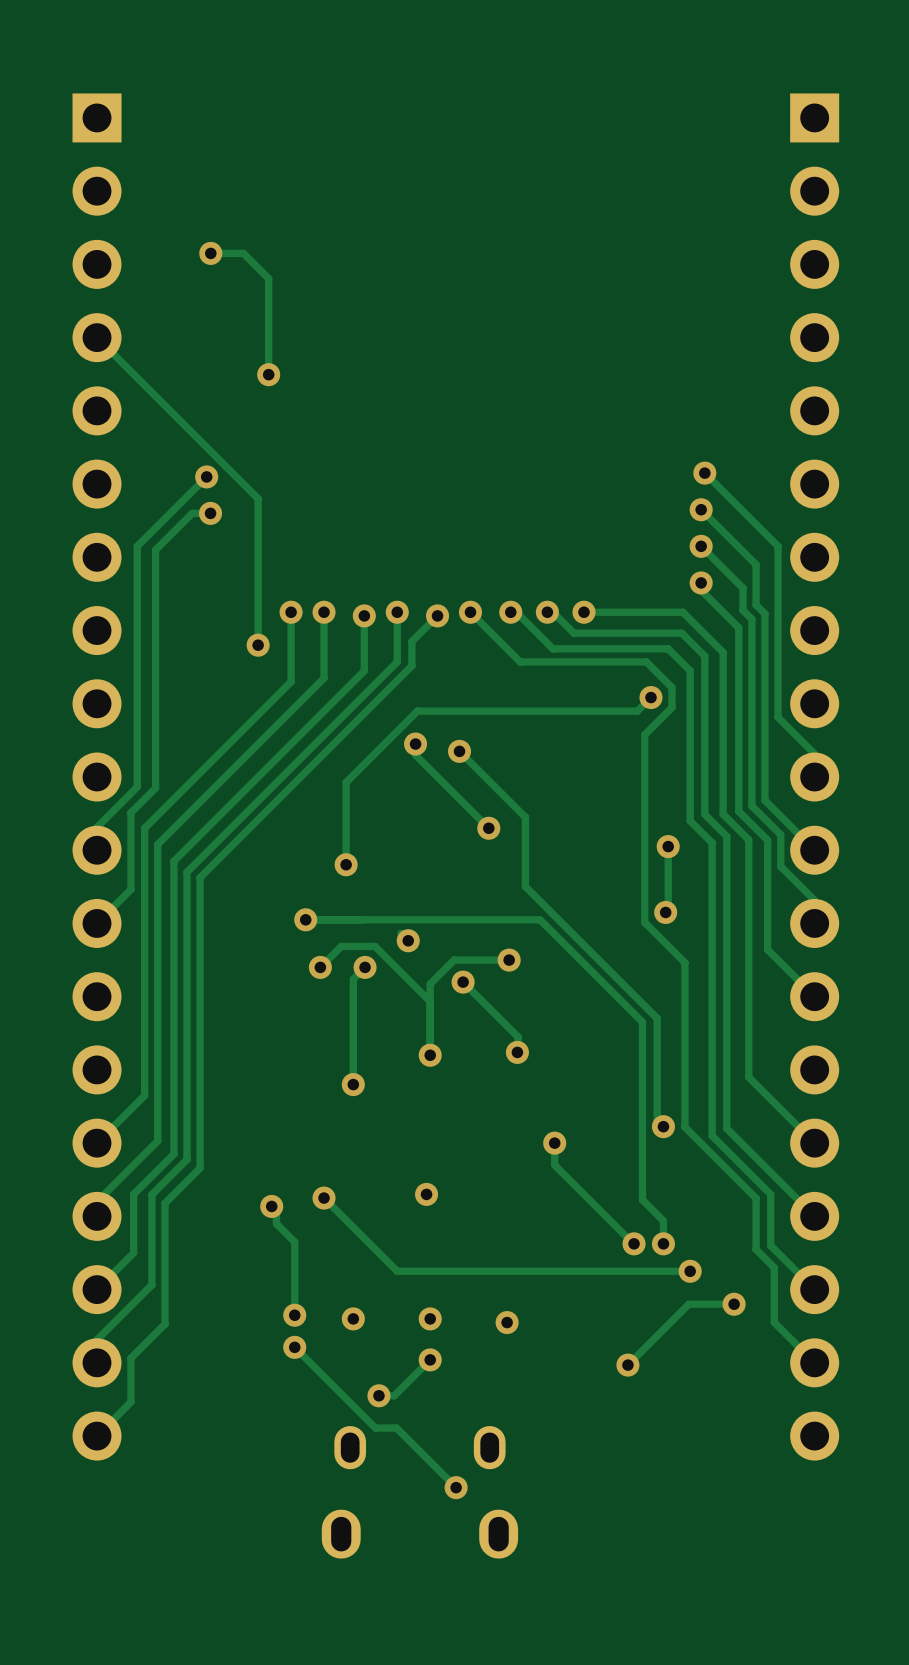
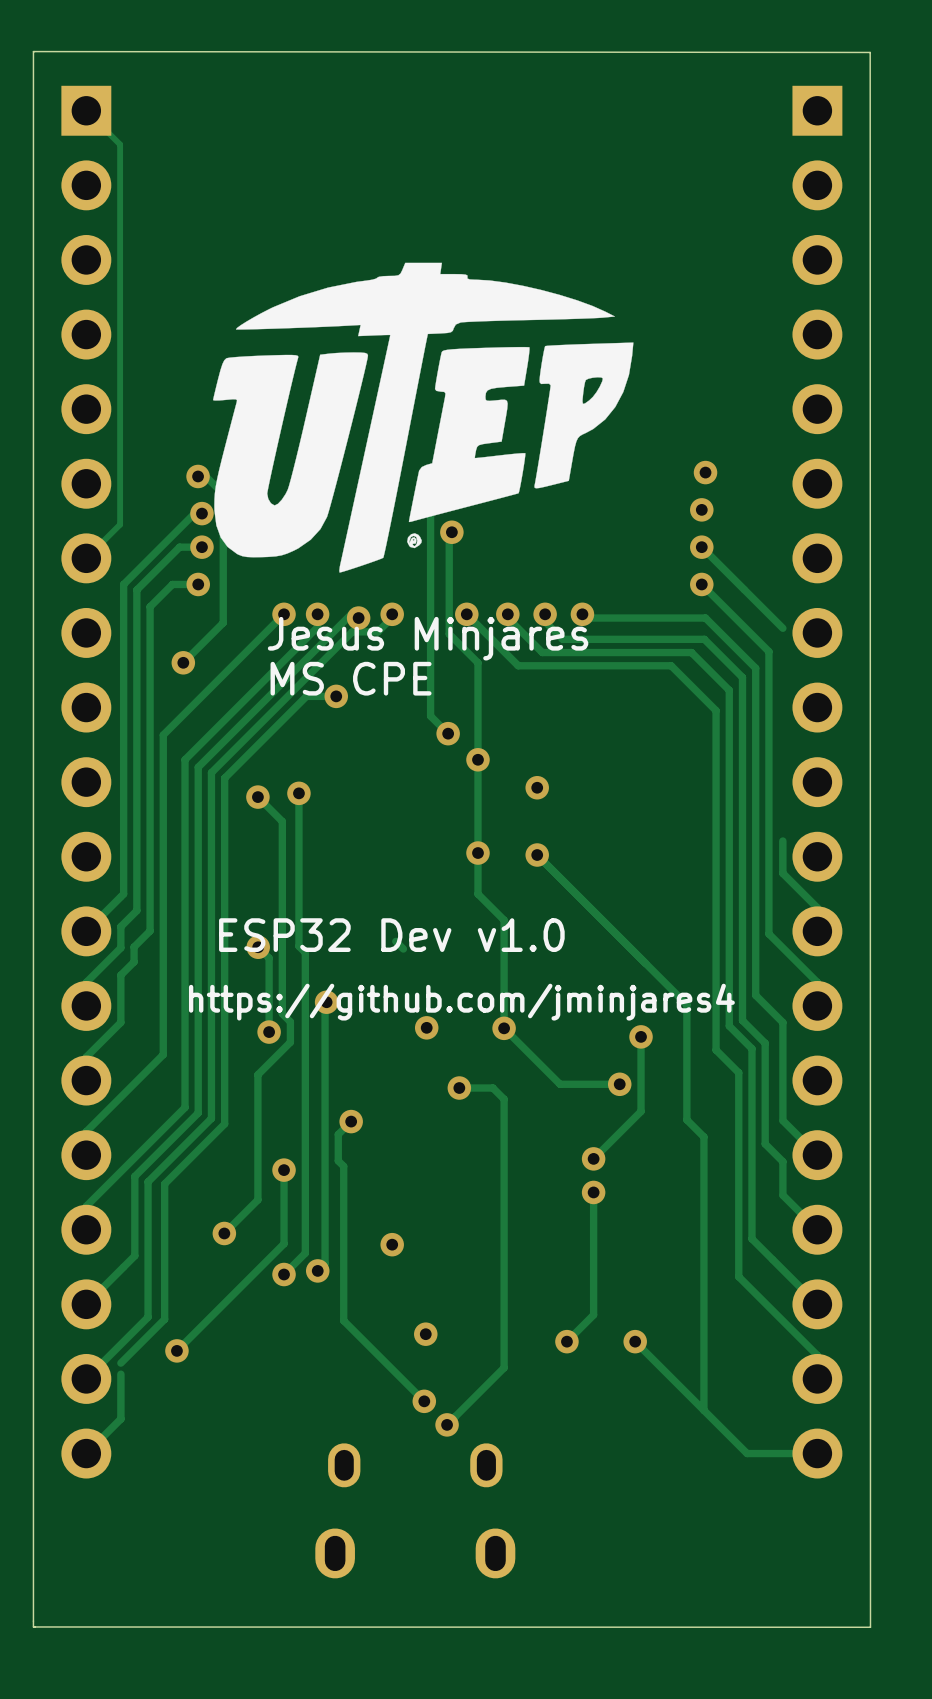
board edge: none -> (34, 51) (33, 1626) (870, 1627) (870, 52) (34, 51)
track: none -> (86, 110) (120, 144) (120, 524) (86, 558)
track: (210, 253) (243, 253) (268, 278) (268, 374) -> none
via: (210, 253) -> none
drawing: none -> [212, 262, 634, 573]
track: (97, 337) (258, 498) (258, 645) -> none
via: (268, 374) -> none
track: none -> (201, 472) (223, 493) (223, 622) (183, 662)
track: (704, 473) (778, 546) (778, 717) (814, 754) (814, 777) -> none
track: (206, 476) (137, 546) (137, 786) (97, 827) (97, 850) -> none
track: none -> (433, 494) (430, 497) (430, 716) (448, 733)
track: (701, 509) (756, 564) (756, 604) (764, 613) (764, 800) (814, 850) -> none
track: (210, 513) (192, 513) (155, 550) (155, 787) (130, 812) (130, 889) -> (198, 509) (123, 584) (123, 894) (120, 896)
track: none -> (451, 532) (449, 534) (449, 634) (477, 662) (477, 894) (504, 920) (504, 1028) (560, 1084) (619, 1084)
via: none -> (451, 532)
track: none -> (201, 547) (179, 547) (136, 589) (136, 910) (120, 926) (120, 947) (86, 982) (86, 1005)
via: none -> (201, 547)
track: none -> (198, 584) (172, 584) (150, 606) (150, 931) (134, 947) (134, 961) (120, 975) (120, 1022) (86, 1057) (86, 1080)
via: none -> (198, 584)
track: (701, 582) (701, 590) (738, 627) (738, 811) (767, 840) (767, 949) (814, 996) -> (701, 584) (768, 651) (768, 933) (817, 982) (817, 1005)
track: (742, 588) (742, 610) (751, 619) (751, 805) (780, 834) -> (744, 589) (782, 628)
track: (291, 612) (291, 681) (144, 828) (144, 1095) (97, 1143) -> (284, 614) (163, 735) (163, 1054) (86, 1131) (86, 1155)
track: (397, 612) (397, 661) (187, 872) (187, 1159) (151, 1194) (151, 1284) (97, 1339) (97, 1362) -> (395, 613) (377, 631) (352, 631) (211, 772) (211, 1118) (148, 1181) (148, 1317) (86, 1378)
track: (510, 612) (516, 612) (552, 648) (668, 648) (690, 670) (690, 820) (712, 842) (712, 1135) (770, 1194) (770, 1245) -> (507, 618) (542, 652) (691, 652) (729, 690) (729, 1026) (751, 1048) (751, 1238) (772, 1259)
track: (547, 612) (552, 612) (573, 633) (681, 633) (704, 656) (704, 813) -> none
track: (584, 612) (682, 612) (723, 652) (723, 814) (748, 839) (748, 1077) (780, 1109) -> (582, 618) (705, 618) (755, 668) (755, 995) (782, 1022) (782, 1120)
track: (364, 615) (364, 670) (173, 861) (173, 1154) (133, 1194) (133, 1253) -> (354, 610) (198, 767) (198, 1113) (134, 1176) (134, 1255) (123, 1267)
track: (437, 615) (411, 641) (411, 665) (200, 877) (200, 1168) (165, 1203) (165, 1324) (130, 1358) -> none
via: (437, 615) -> none
track: (324, 624) (324, 678) (157, 844) (157, 1141) (97, 1201) -> (317, 627) (185, 759) (185, 1107) (86, 1206) (86, 1214)
text: none -> Jesus Minjares (428, 638)
via: (258, 645) -> none
via: none -> (183, 662)
track: (520, 661) (646, 661) (671, 687) (671, 707) (644, 734) (644, 922) (684, 962) (684, 1127) (756, 1198) (756, 1249) (774, 1267) (774, 1322) (814, 1362) -> (517, 664) (671, 665) (716, 710) (716, 1050) (738, 1072) (738, 1276) (817, 1355) (817, 1378)
text: none -> MS CPE (351, 678)
track: none -> (336, 696) (306, 696) (224, 778) (224, 1123) (164, 1183) (164, 1319) (120, 1363)
via: none -> (336, 696)
track: (651, 697) (637, 711) (417, 711) (346, 782) (346, 864) -> none
via: (651, 697) -> none
via: none -> (448, 733)
track: (415, 744) (415, 755) (488, 828) -> none
via: (415, 744) -> none
track: (459, 751) (525, 817) (525, 886) (657, 1018) (657, 1120) (663, 1126) -> none
via: (459, 751) -> none
via: none -> (477, 759)
via: none -> (537, 787)
track: none -> (298, 793) (298, 946) (305, 952) (305, 1253) (284, 1274)
via: none -> (298, 793)
track: none -> (257, 797) (282, 821) (282, 1013) (290, 1021) (290, 1042) (257, 1074) (257, 1199) (224, 1233)
via: none -> (257, 797)
track: (704, 814) (726, 836) (726, 1128) (780, 1182) -> (545, 621) (562, 639) (704, 639) (742, 677) (742, 1020) (765, 1043) (765, 1143) (782, 1161) (782, 1195)
via position: (488, 828) -> (477, 853)
track: (668, 846) (668, 909) (665, 912) -> none
via: (668, 846) -> none
track: none -> (537, 855) (686, 1004) (686, 1119) (703, 1136) (703, 1410)
via: none -> (537, 855)
via: (346, 864) -> none
via: (665, 912) -> none
track: (305, 919) (540, 919) (642, 1022) (642, 1199) (663, 1220) (663, 1243) -> none
via: (305, 919) -> none
text: none -> ESP32 Dev v1.0 (391, 935)
track: none -> (258, 947) (269, 958) (269, 1032)
via: none -> (258, 947)
via: (408, 940) -> none
track: (509, 960) (454, 960) (430, 984) (430, 1055) -> none
via: (509, 960) -> none
track: (320, 967) (341, 946) (375, 946) (430, 1001) -> none
via: (320, 967) -> none
track: (365, 967) (353, 979) (353, 1084) -> none
via: (365, 967) -> none
track: (463, 982) (518, 1037) (517, 1052) -> none
via: (463, 982) -> none
text: none -> https://github.com/jminjares4 (461, 1002)
track: none -> (326, 1002) (325, 1003) (325, 1263) (317, 1270)
via: none -> (326, 1002)
via: none -> (426, 1027)
via: none -> (504, 1028)
via: none -> (269, 1032)
track: none -> (641, 1036) (641, 1111) (593, 1158)
via: none -> (641, 1036)
via: (517, 1052) -> none
via: (430, 1055) -> none
via: none -> (619, 1084)
track: none -> (459, 1088) (492, 1088) (504, 1099) (504, 1367) (447, 1424)
via: none -> (459, 1088)
via position: (353, 1084) -> (351, 1121)
track: none -> (351, 1121) (338, 1134) (338, 1160) (343, 1166) (343, 1320) (424, 1401)
via: (663, 1126) -> none
track: (554, 1143) (554, 1165) (634, 1243) -> none
via: (554, 1143) -> none
via: none -> (593, 1158)
track: none -> (284, 1170) (284, 1243) (176, 1350)
via: none -> (284, 1170)
track: none -> (593, 1192) (593, 1314) (566, 1341)
via: none -> (593, 1192)
via: (426, 1194) -> none
track: (324, 1198) (397, 1271) (690, 1271) -> none
via: (324, 1198) -> none
track: (271, 1206) (276, 1211) (276, 1223) (294, 1242) (294, 1315) -> none
via: (271, 1206) -> none
via: none -> (224, 1233)
via: none -> (392, 1244)
via: (634, 1243) -> none
via: (663, 1243) -> none
via: none -> (317, 1270)
via: none -> (284, 1274)
via: (690, 1271) -> none
track: (734, 1304) (688, 1304) (627, 1365) -> none
via: (734, 1304) -> none
via: (294, 1315) -> none
via: (353, 1318) -> none
via: (507, 1322) -> none
via: none -> (566, 1341)
track: none -> (635, 1341) (747, 1453) (817, 1453)
via: none -> (635, 1341)
via: none -> (176, 1350)
track: (294, 1347) (375, 1428) (396, 1428) (456, 1487) -> none
via: (294, 1347) -> none
track: (430, 1359) (394, 1395) (378, 1395) -> none
via position: (430, 1359) -> (424, 1401)
via: (627, 1365) -> none
via: (378, 1395) -> none
via: none -> (447, 1424)
via: (456, 1487) -> none

